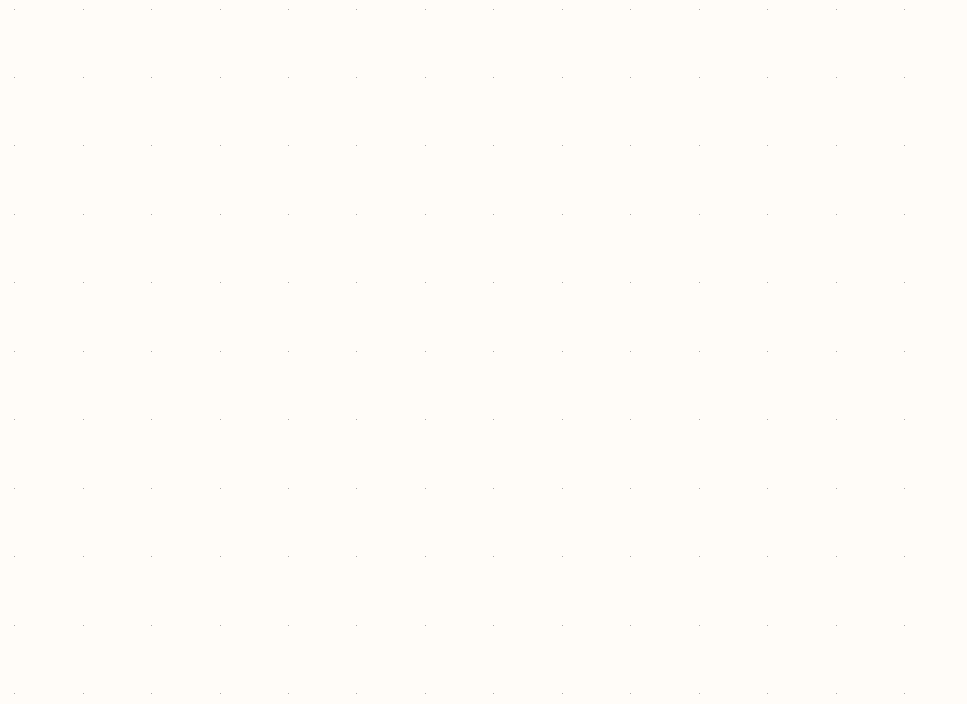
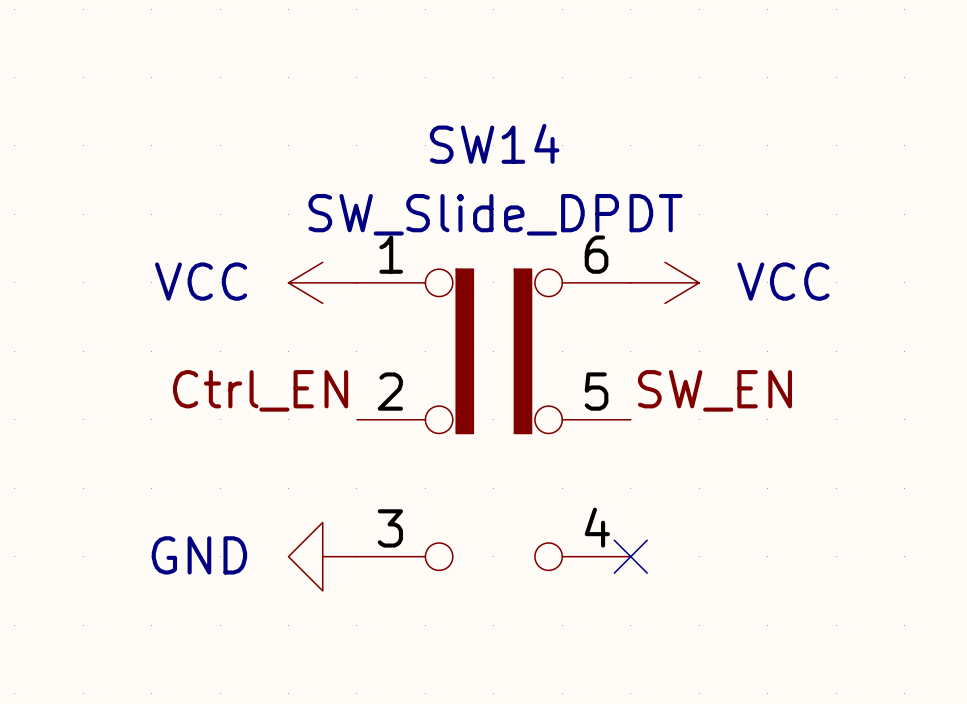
power symbol: none -> VCC (322, 282)
power symbol: none -> VCC (665, 282)
label: none -> Ctrl_EN (260, 390)
label: none -> SW_EN (714, 390)
SW14: none -> SW_Slide_DPDT (493, 419)
power symbol: none -> GND (322, 556)
no-connect mark: none -> (630, 556)

